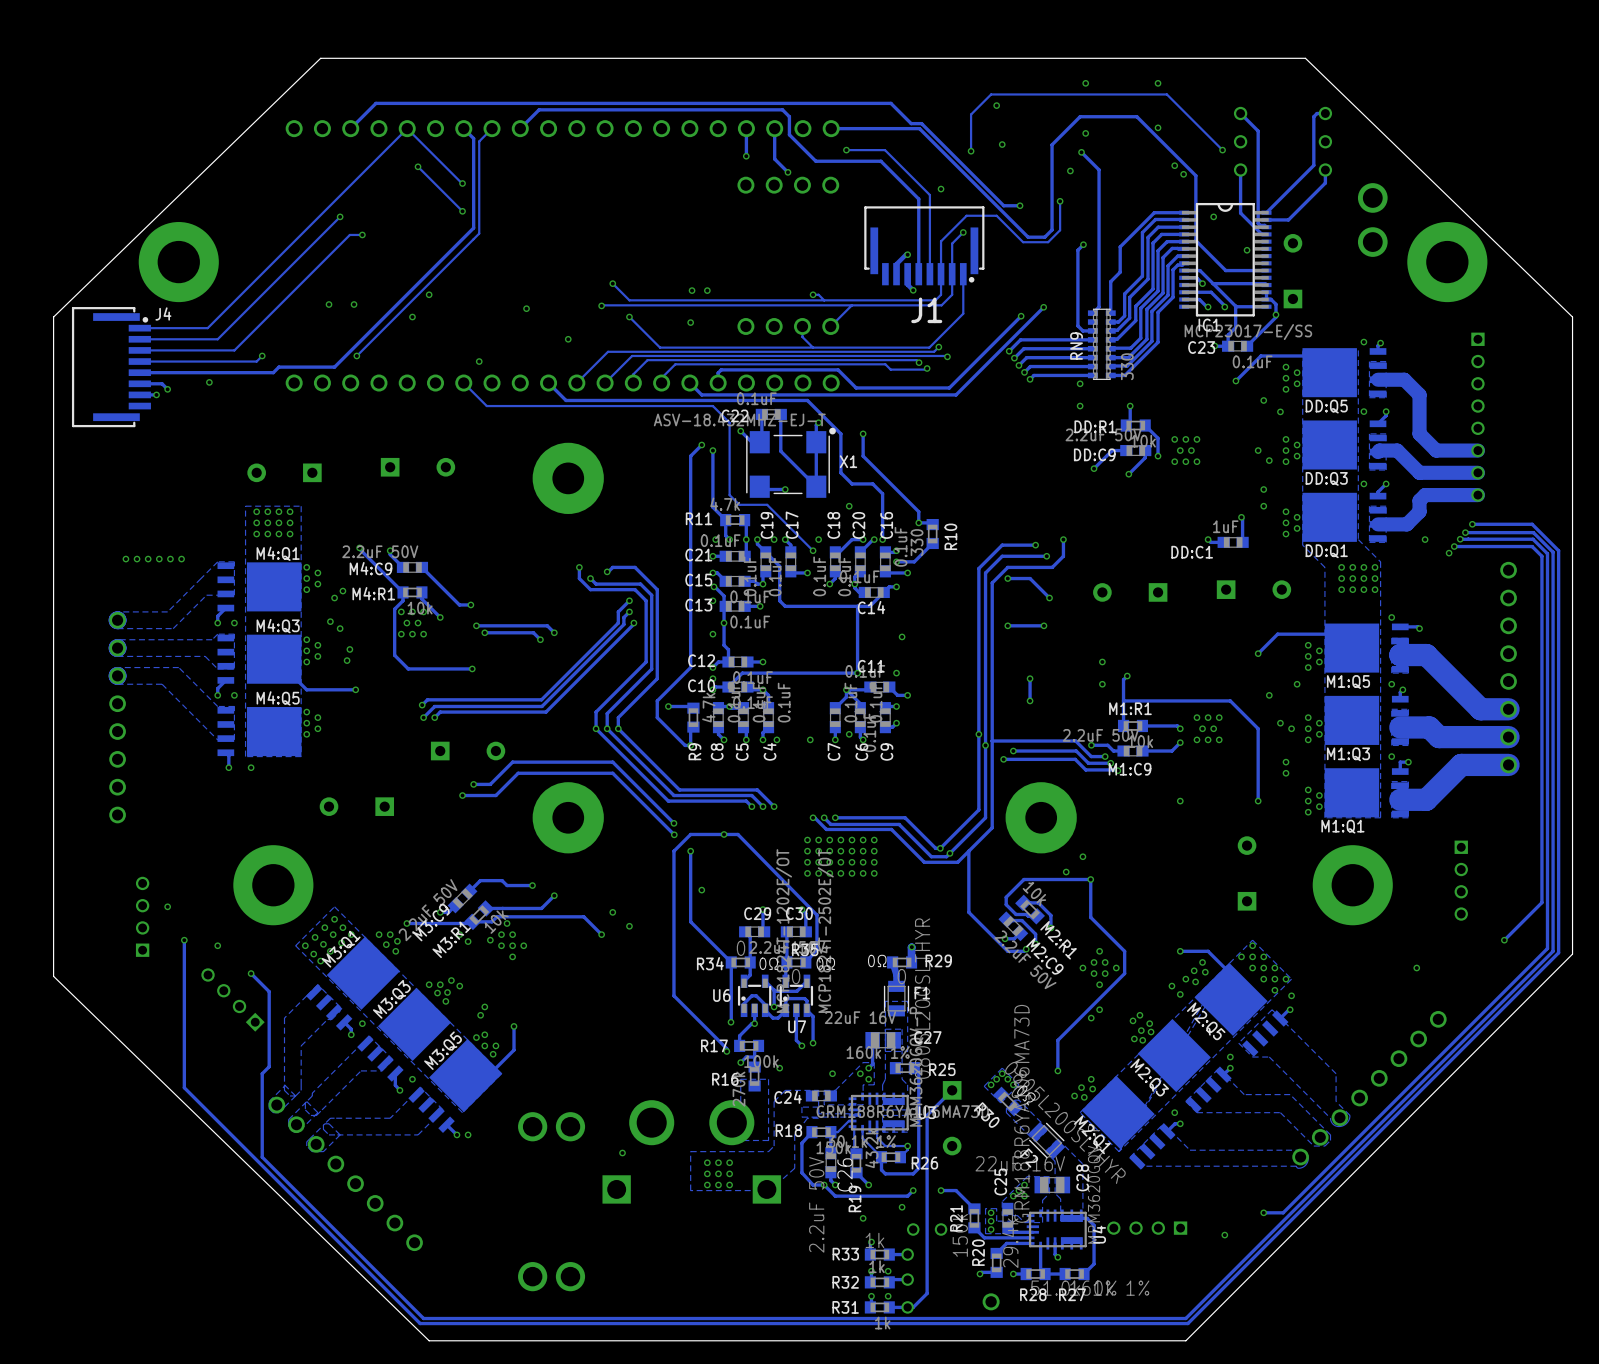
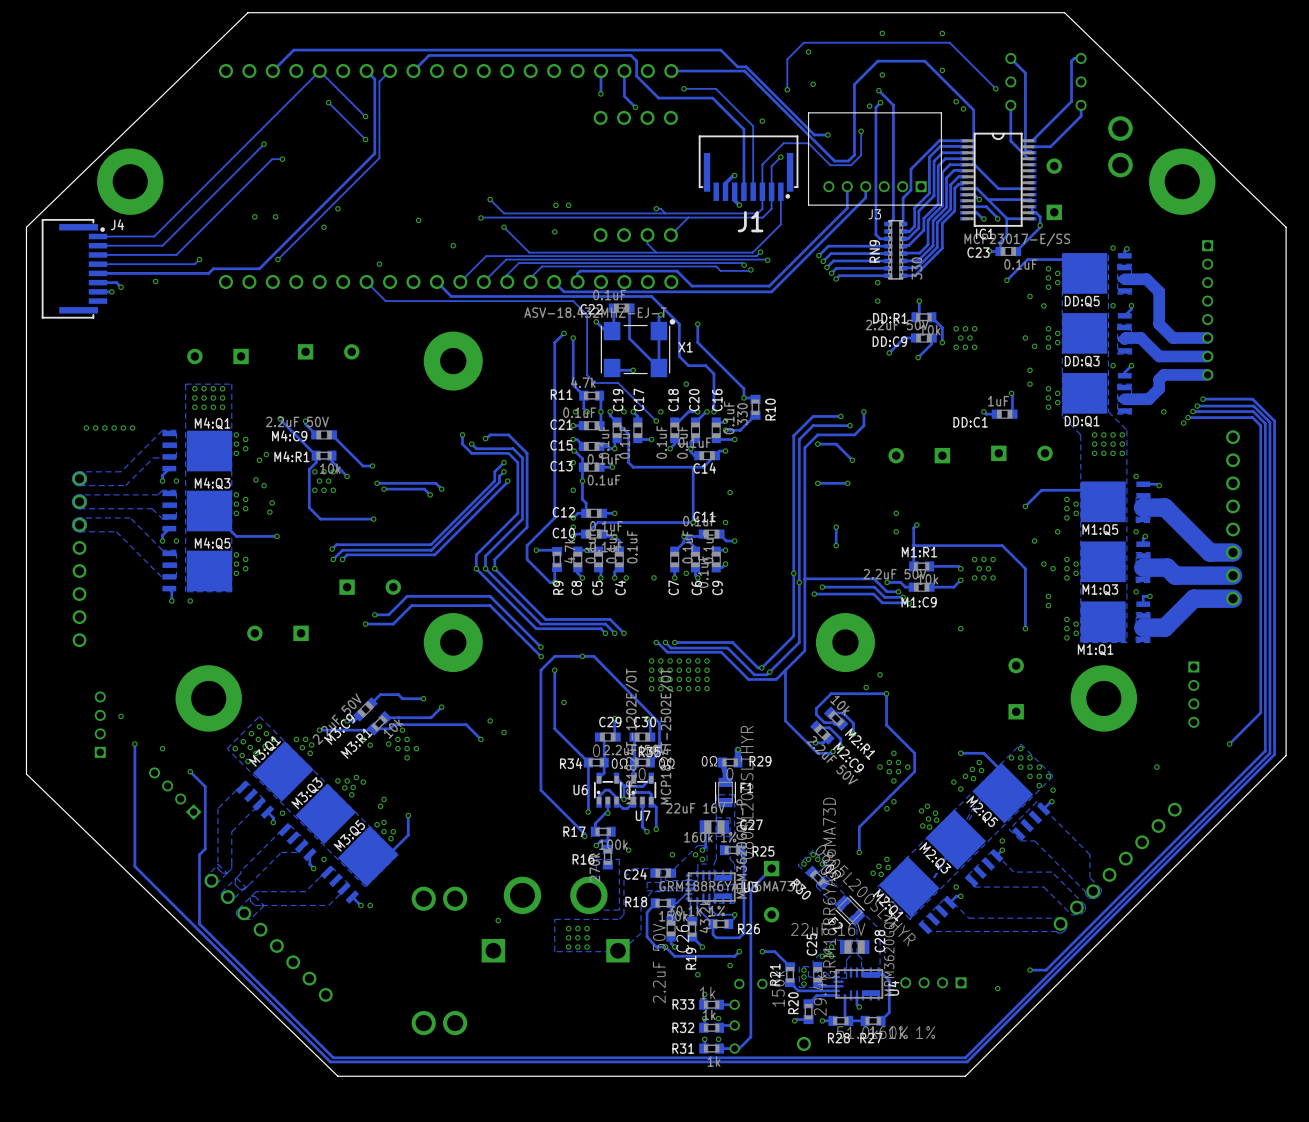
via: none -> (880, 102)
via: (1213, 216) -> none
J3: none -> (874, 158)
track: (1083, 244) (1077, 250) -> (880, 102) (875, 107) (875, 171)
via: (1083, 244) -> none
via: (1247, 250) -> none
track: none -> (847, 186) (847, 208) (828, 226)
track: (1043, 307) (956, 394) (952, 394) -> (865, 186) (865, 197) (771, 291)
via: (1043, 307) -> none
via: (1021, 316) -> none

